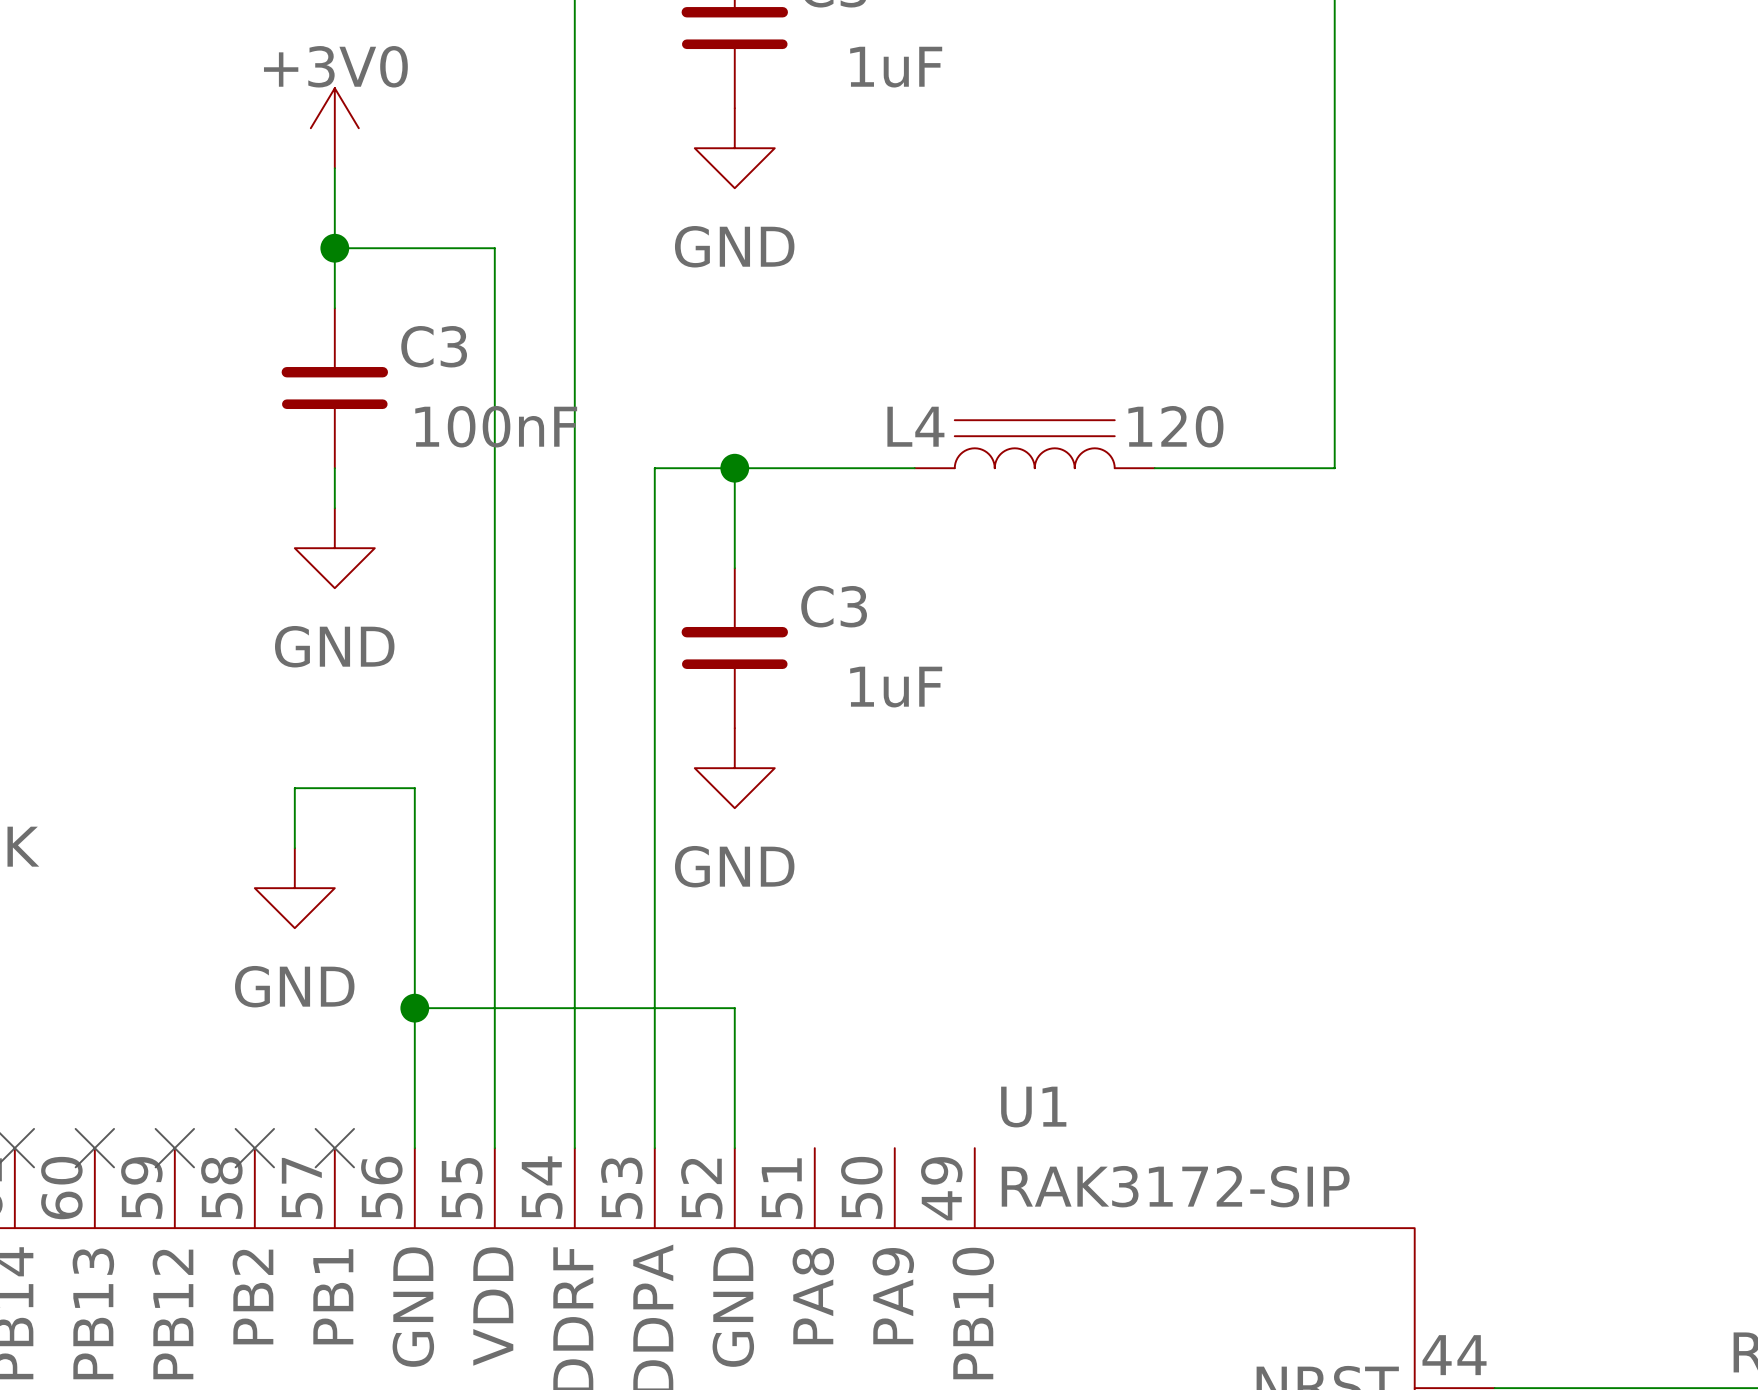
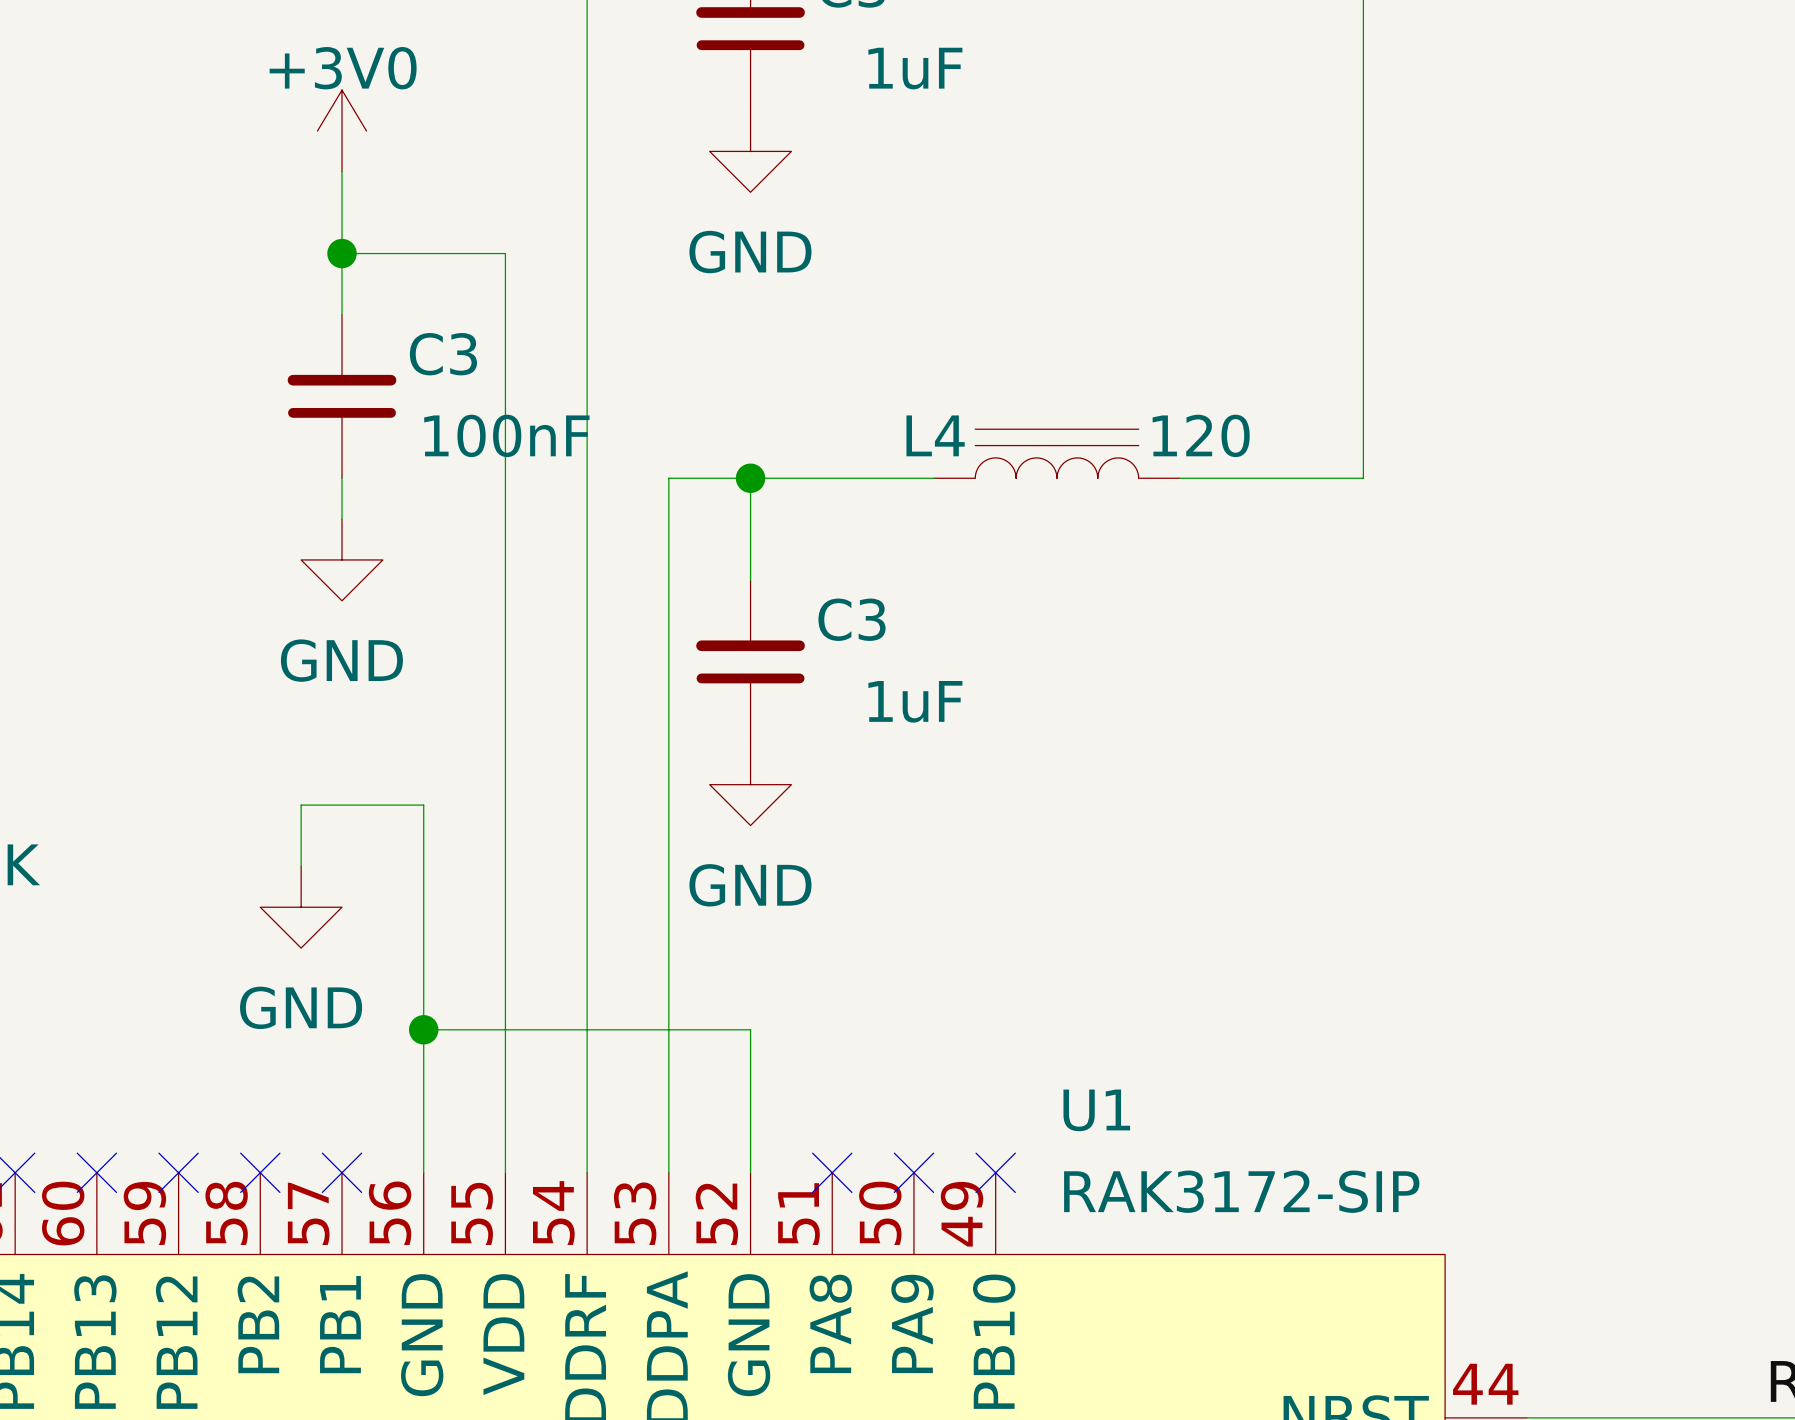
U1 name position: U1 (1033, 1107) -> U1 (1096, 1110)
no-connect mark: none -> (832, 1172)
no-connect mark: none -> (913, 1172)
no-connect mark: none -> (995, 1172)
U1 value position: RAK3172-SIP (1175, 1186) -> RAK3172-SIP (1241, 1191)

